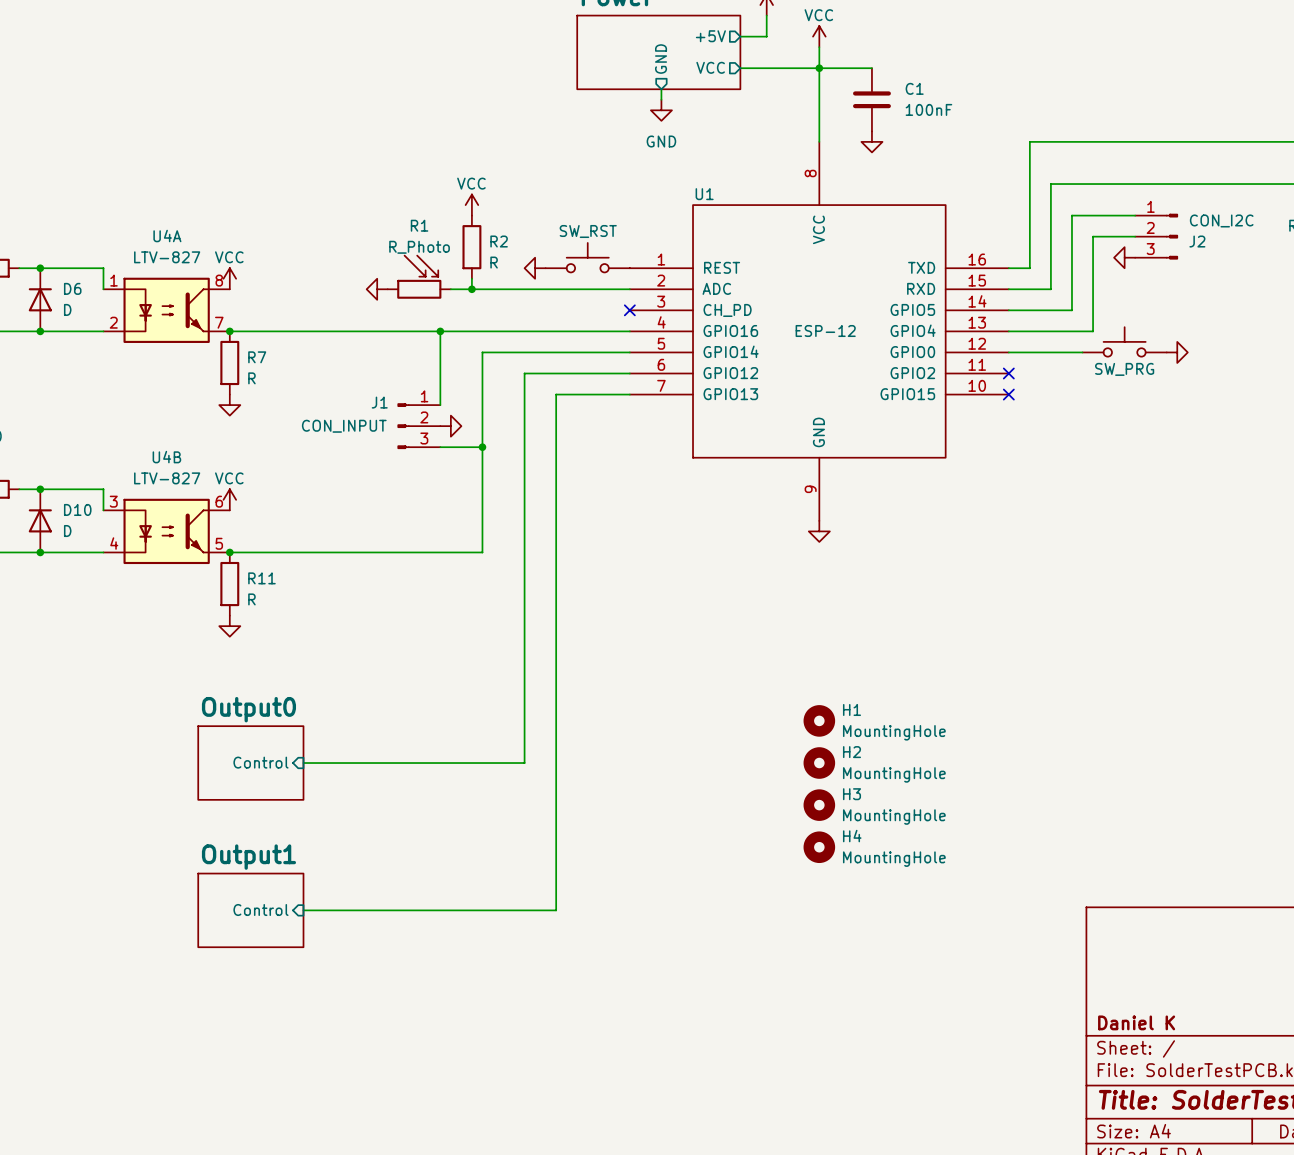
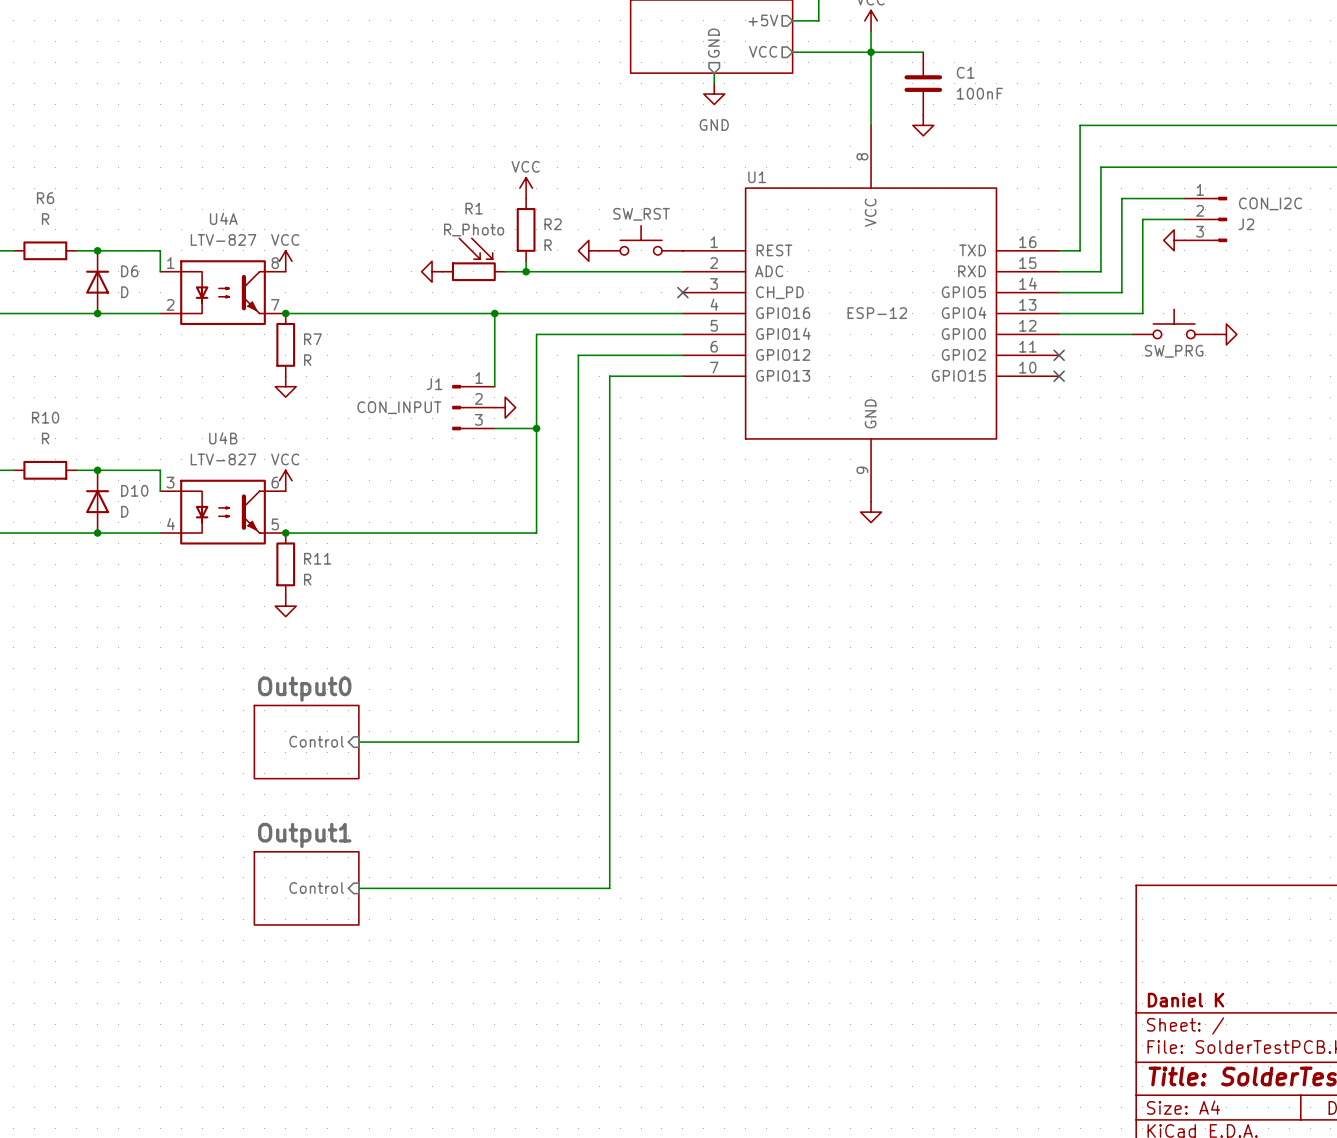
H1: MountingHole (819, 720) -> none
H2: MountingHole (819, 763) -> none
H3: MountingHole (819, 805) -> none
H4: MountingHole (819, 847) -> none

